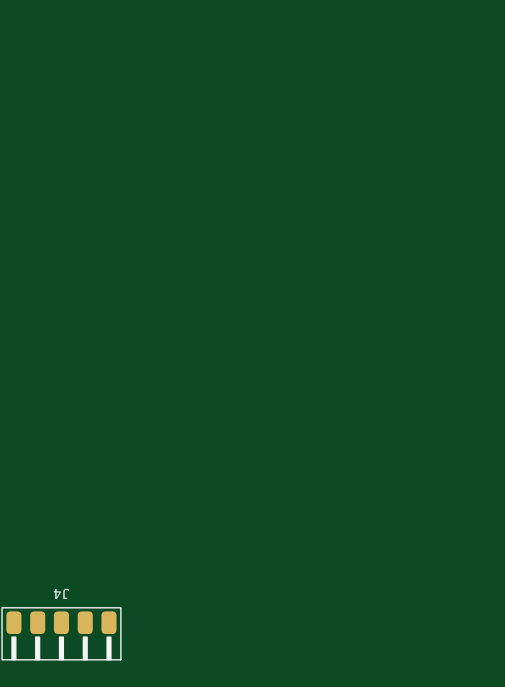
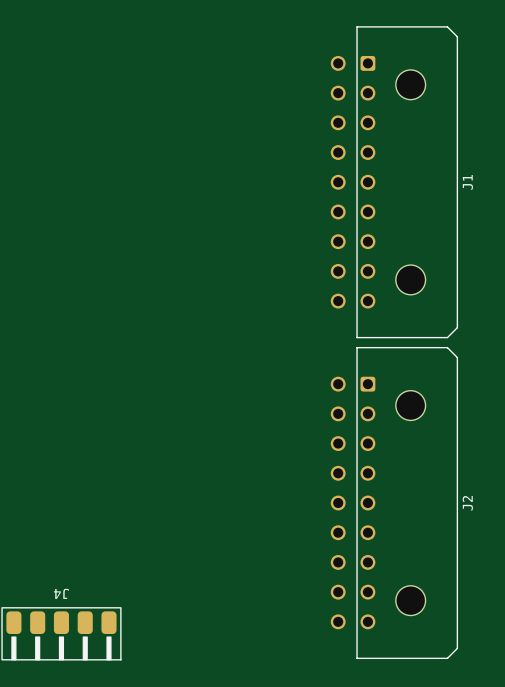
J1: none -> (394, 182)
J2: none -> (394, 503)

